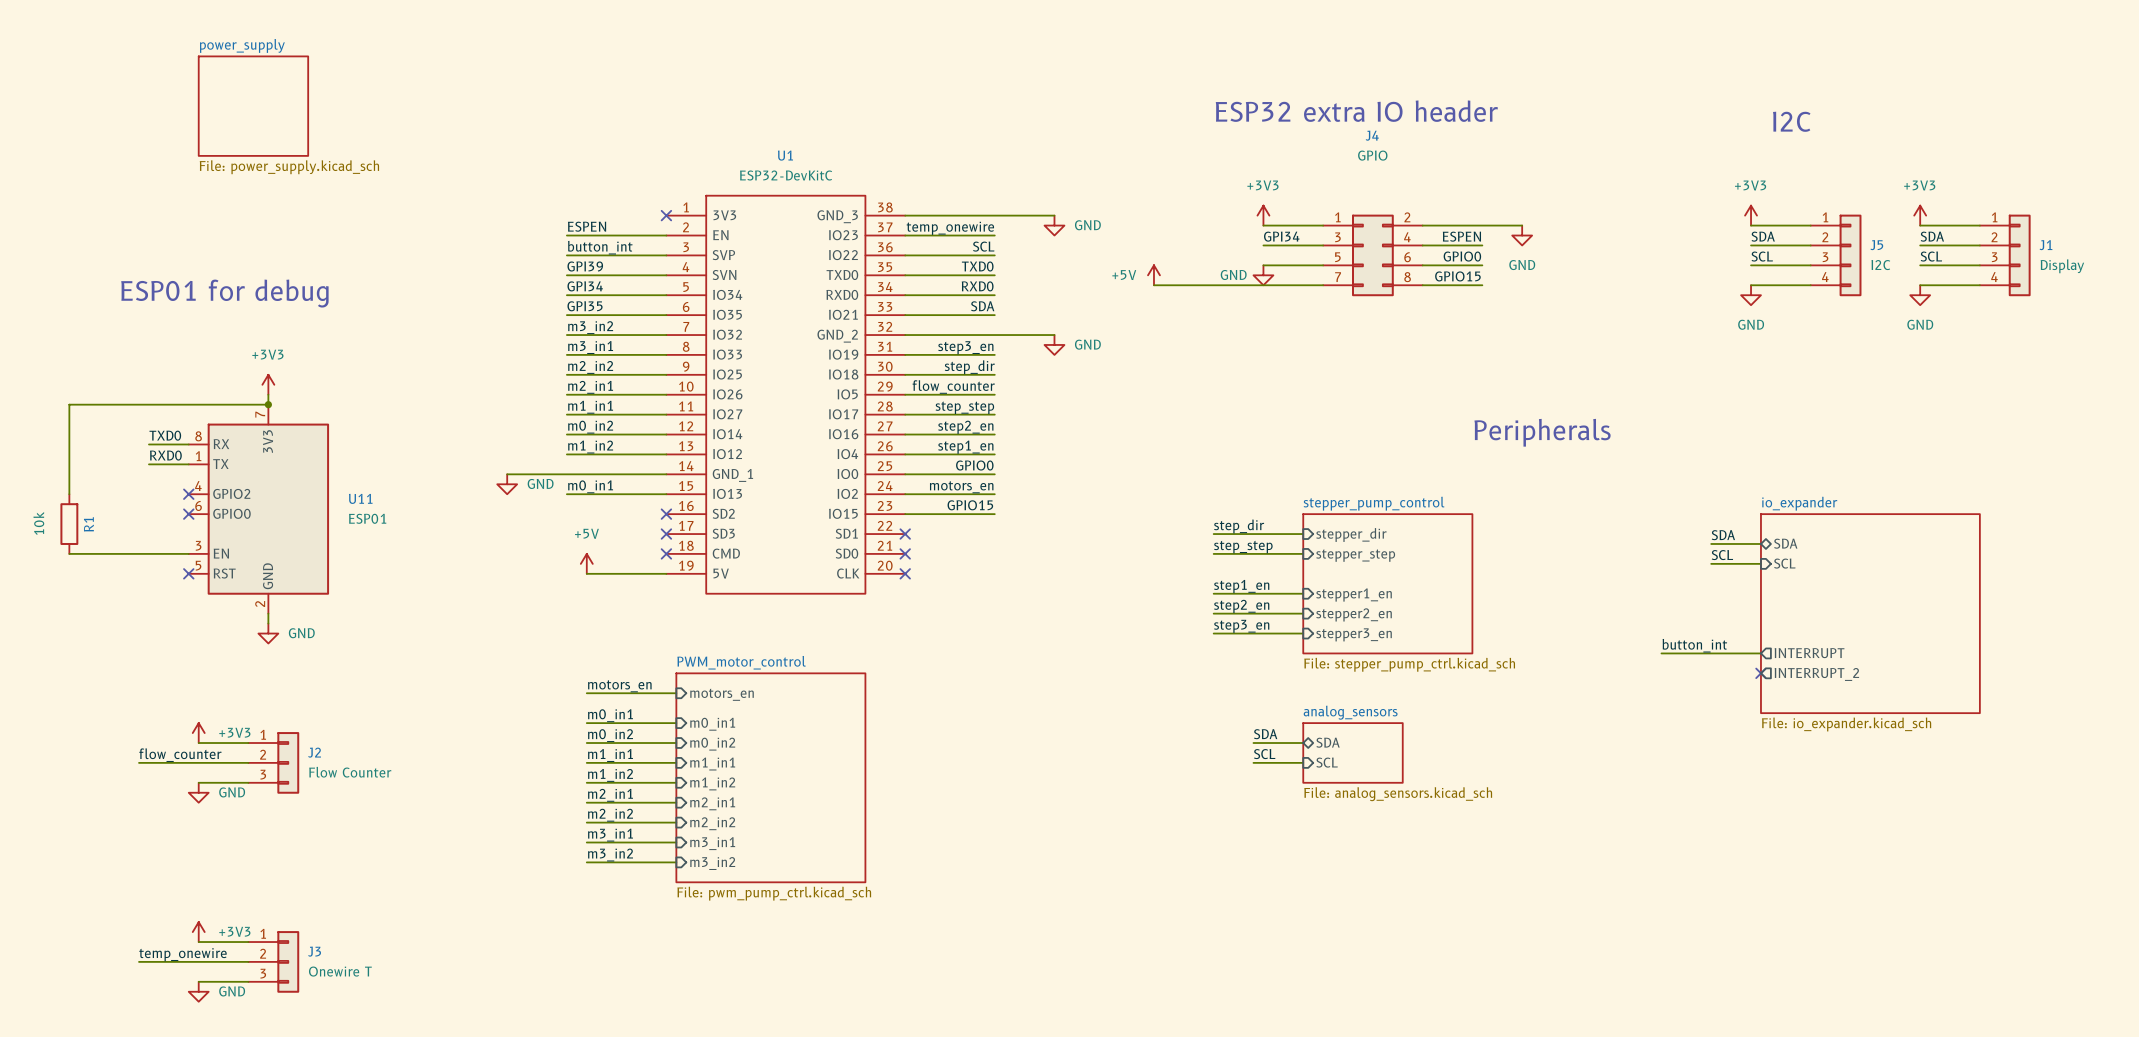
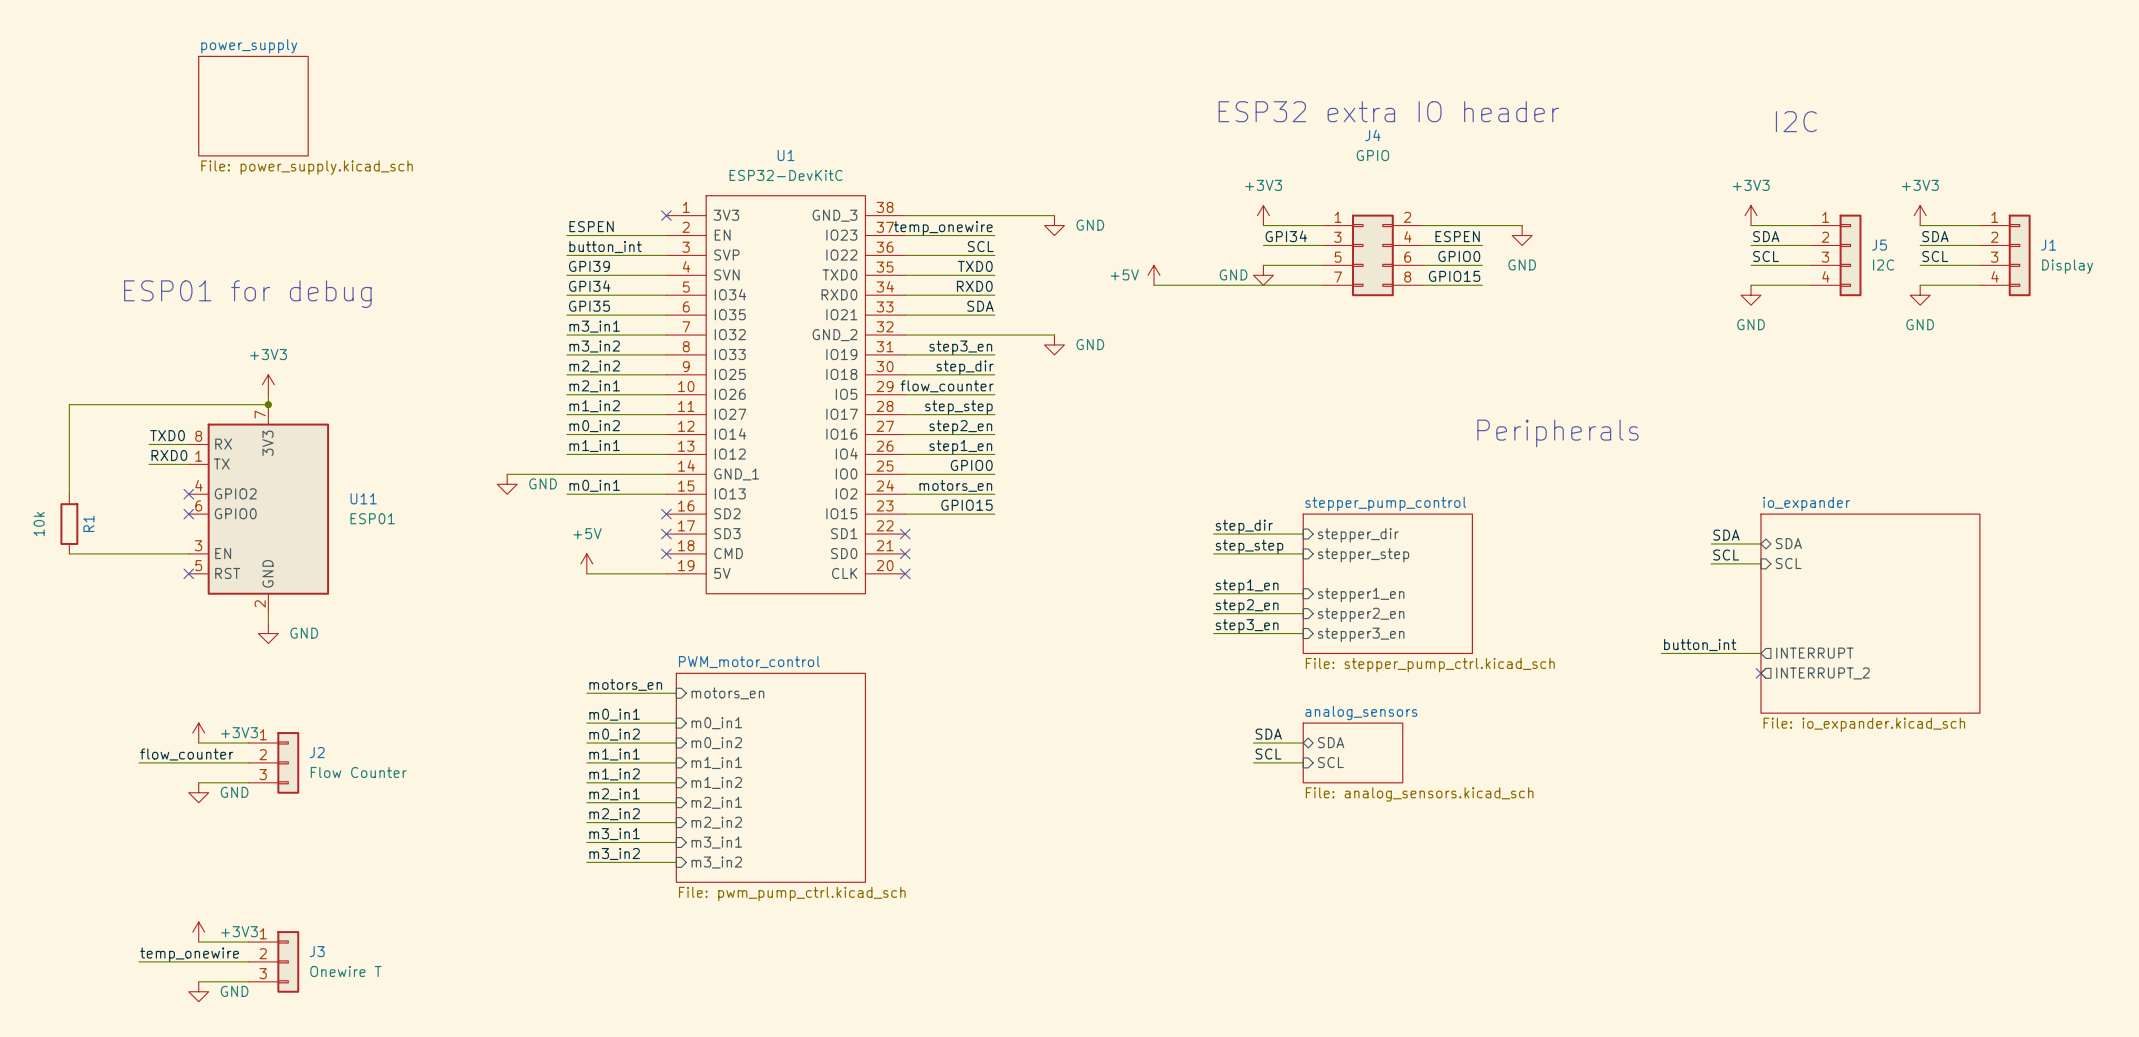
label: m3_in2 (590, 327) -> m3_in1 (594, 326)
label: m3_in1 (590, 347) -> m3_in2 (594, 346)
label: m1_in1 (590, 407) -> m1_in2 (594, 406)
label: m1_in2 (590, 447) -> m1_in1 (594, 446)

